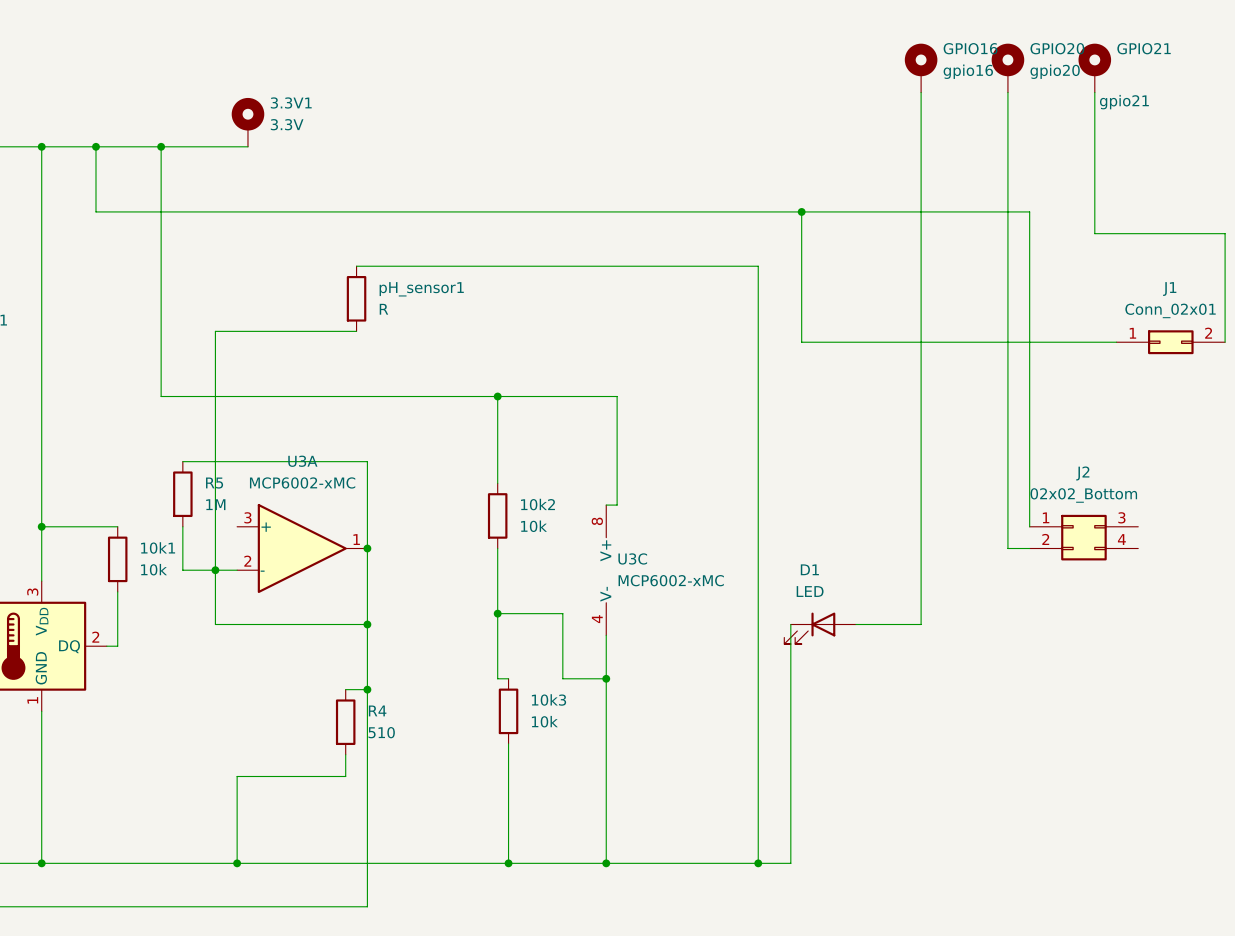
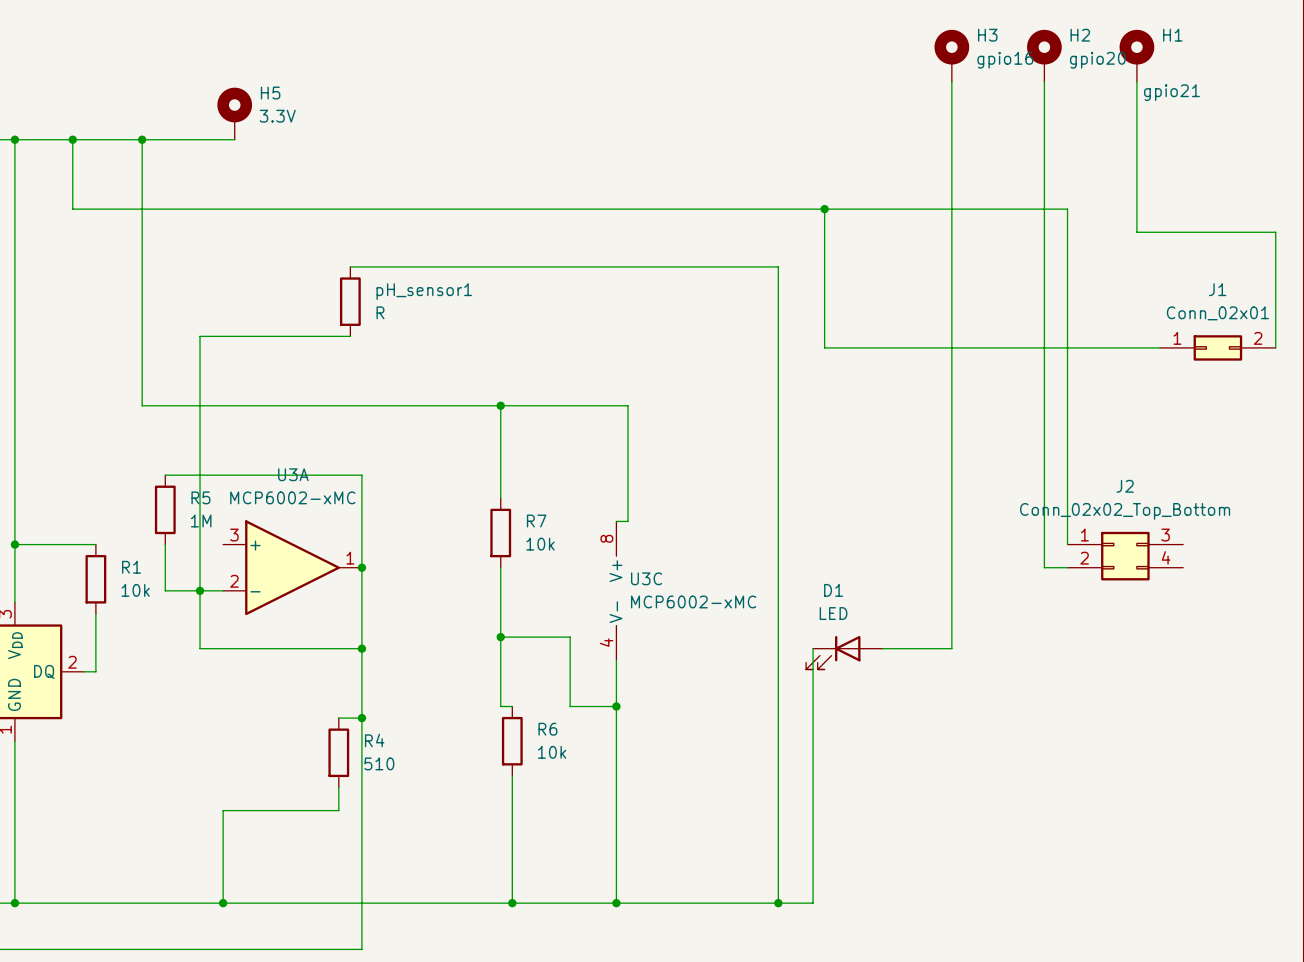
GPIO16 name: GPIO16 (970, 48) -> H3 (987, 35)
GPIO20 name: GPIO20 (1057, 48) -> H2 (1080, 35)
GPIO21 name: GPIO21 (1144, 48) -> H1 (1172, 35)
3.3V1 name: 3.3V1 (291, 102) -> H5 (270, 93)
J2 value: 02x02_Bottom (1083, 495) -> Conn_02x02_Top_Bottom (1125, 511)
10k2 name: 10k2 (538, 504) -> R7 (536, 521)
10k1 name: 10k1 (158, 547) -> R1 (131, 567)
10k3 name: 10k3 (549, 699) -> R6 (547, 729)

